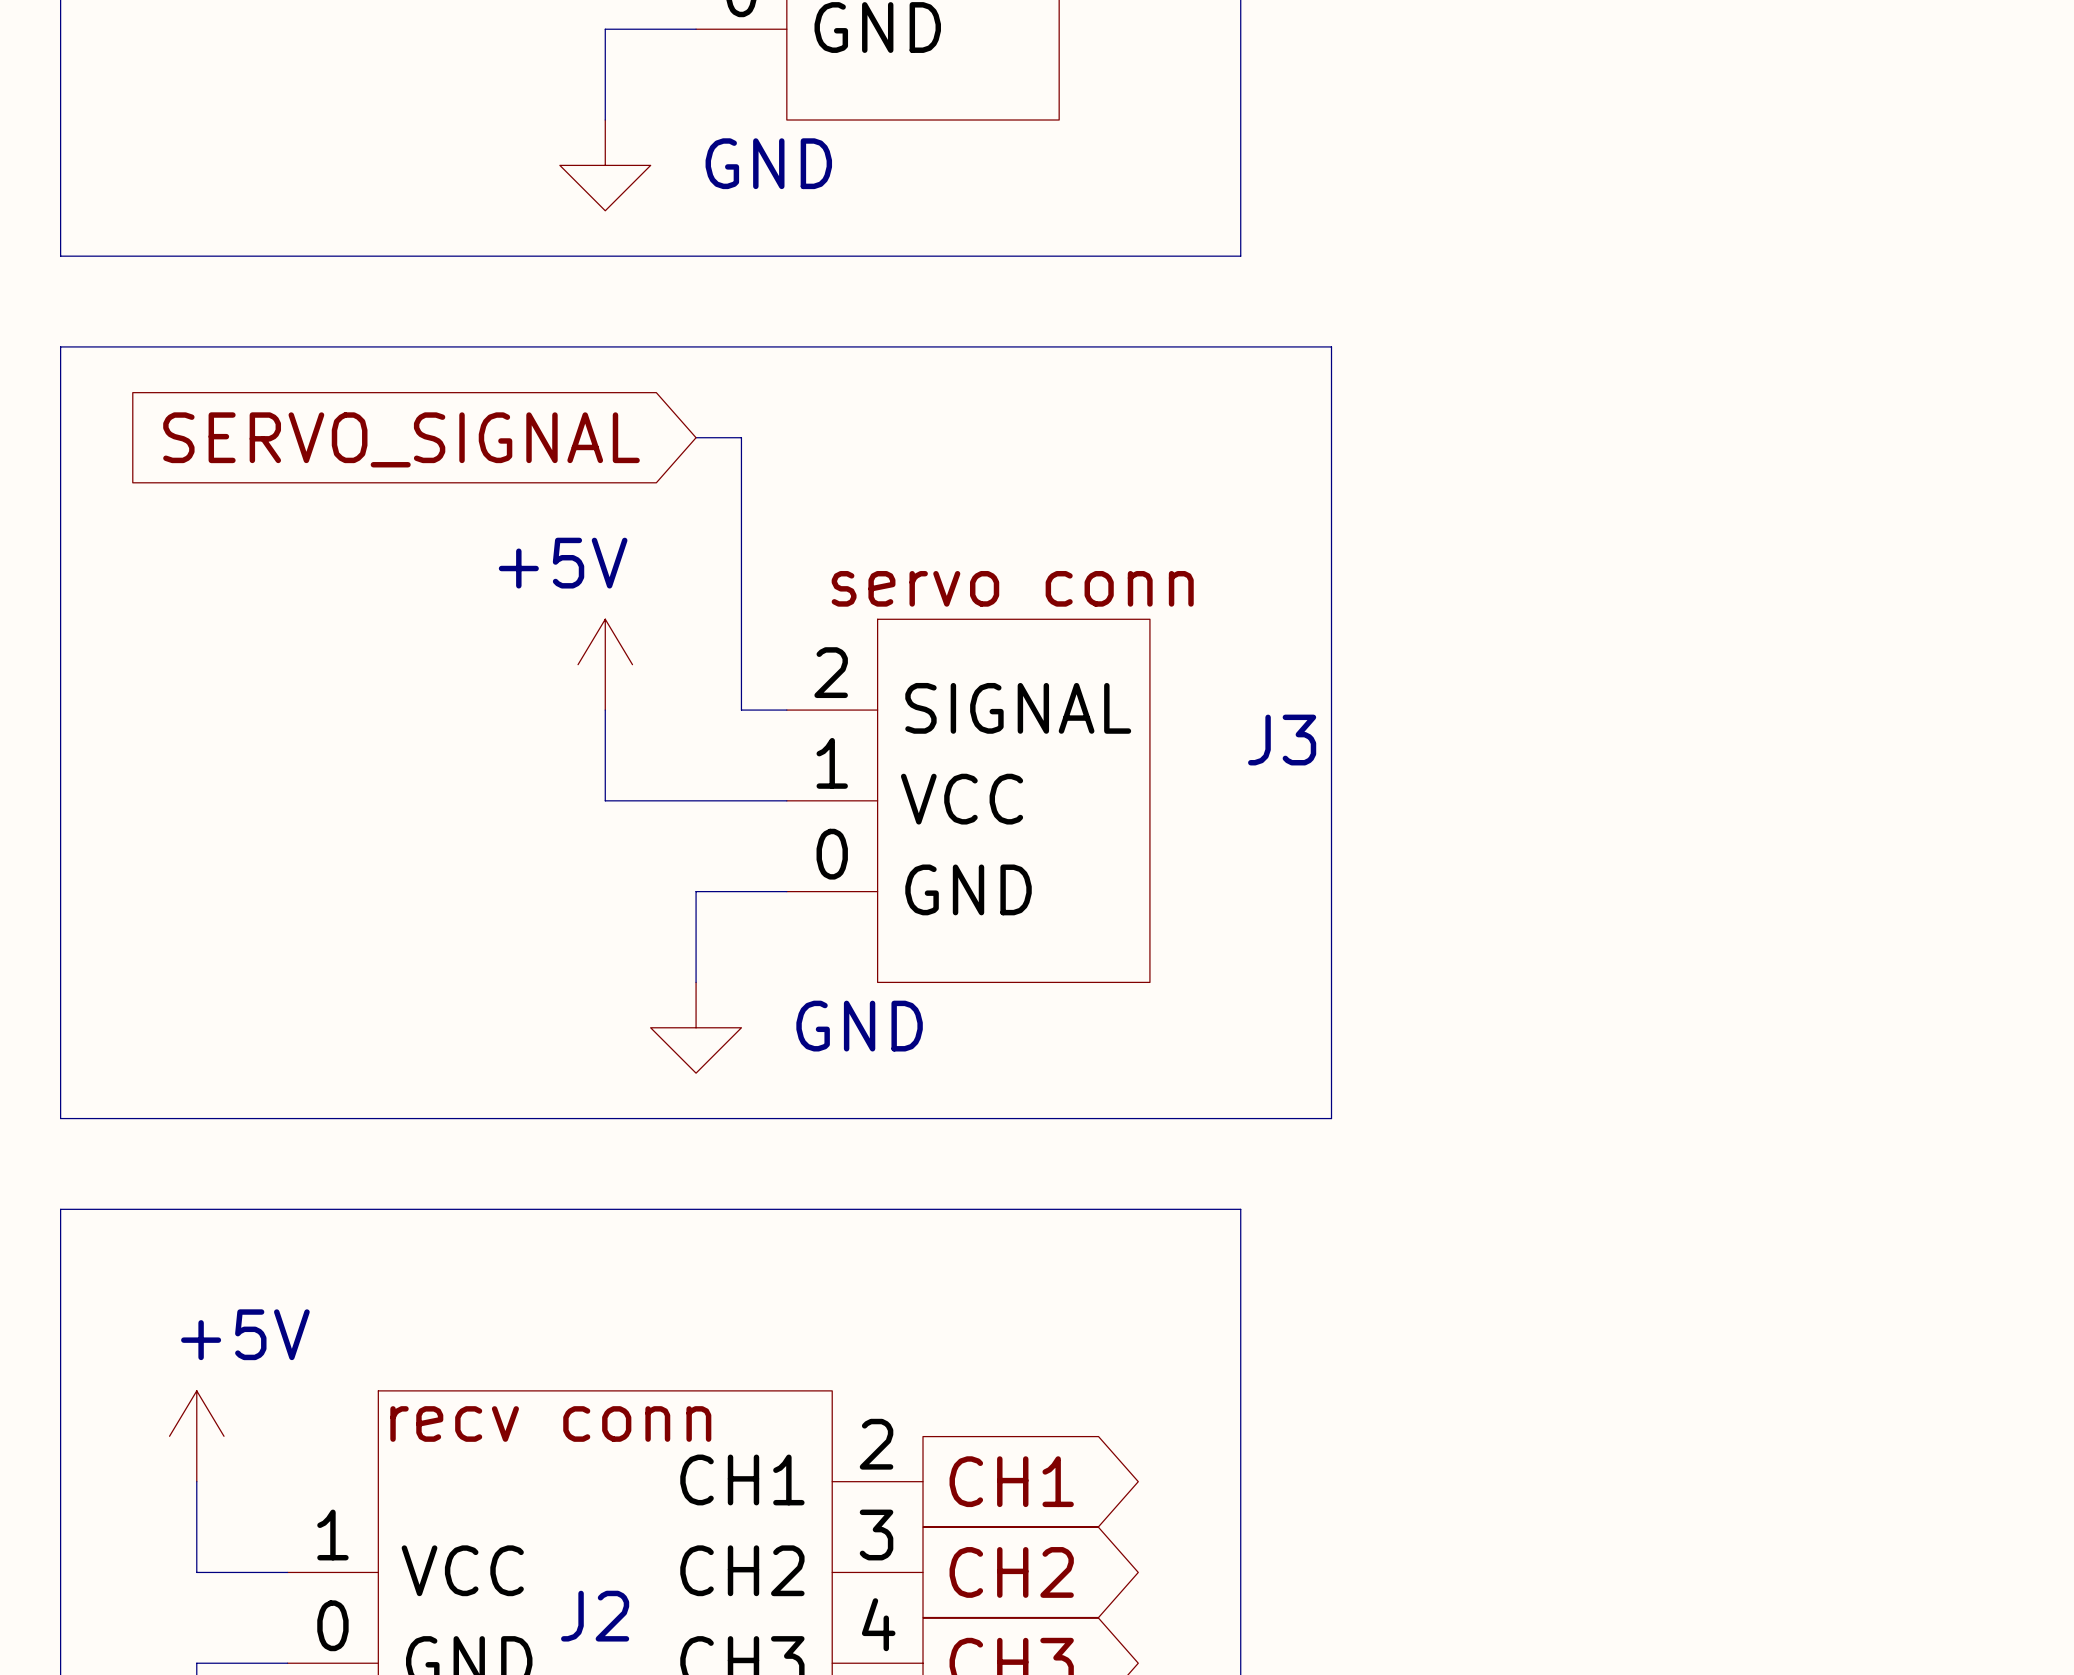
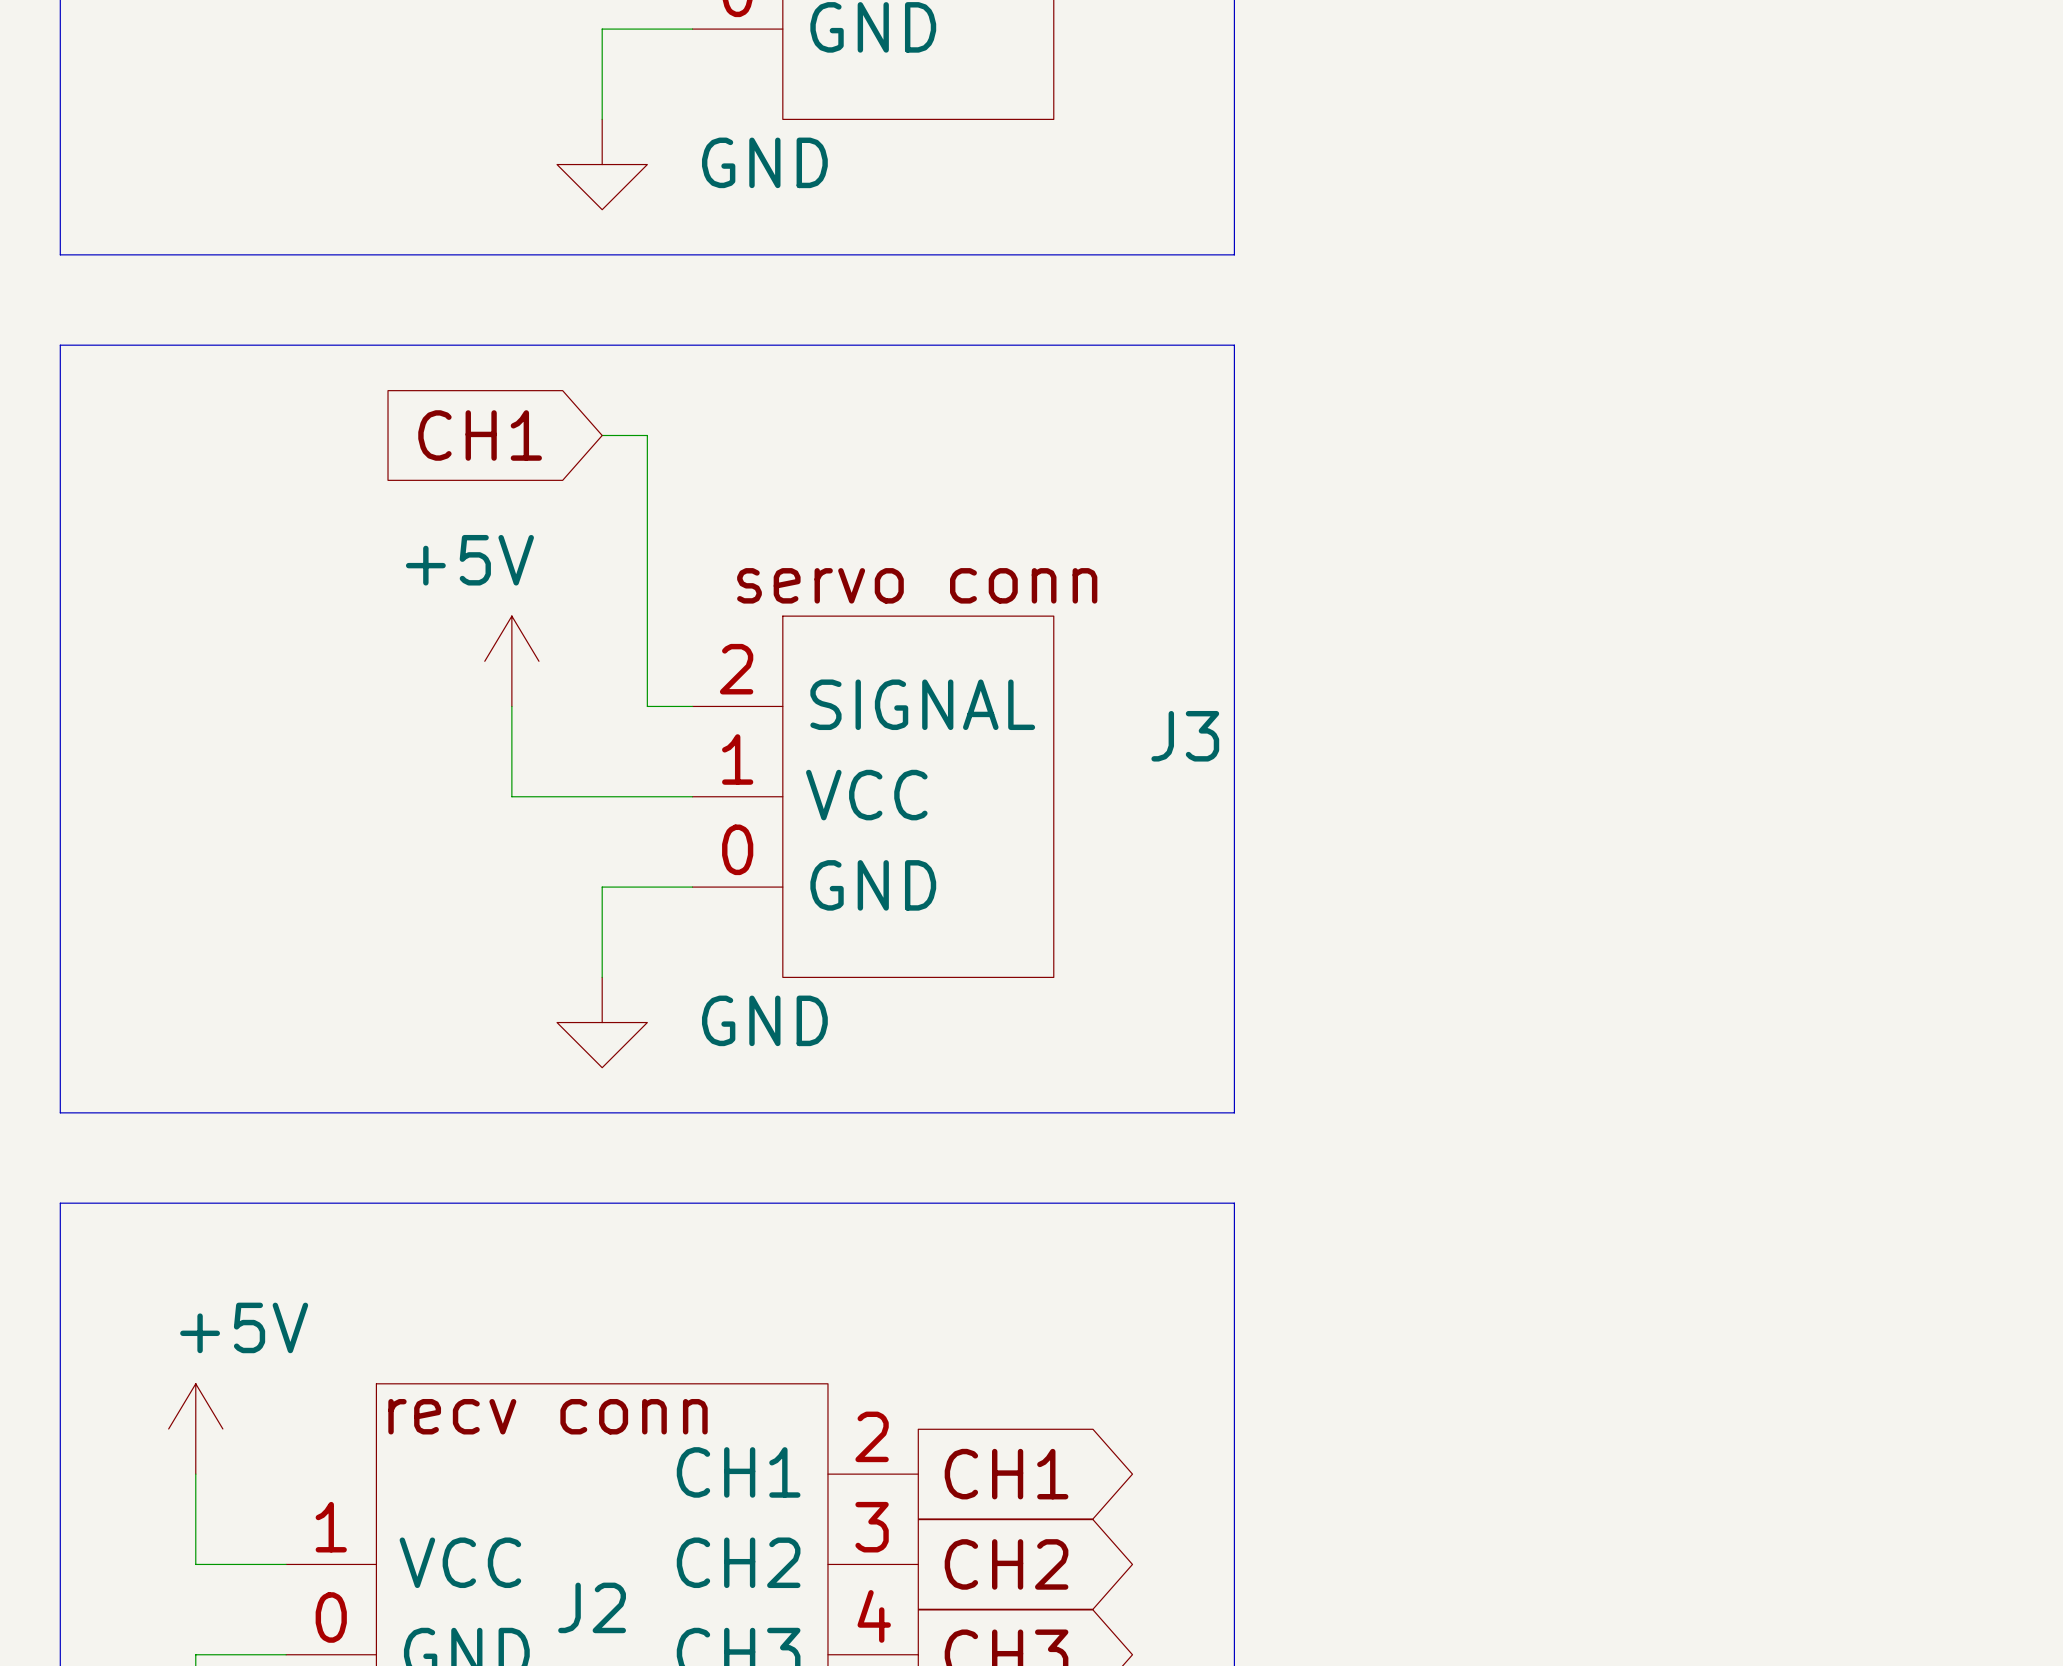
line: (1240, 346) (1331, 346) (1331, 1118) (1240, 1118) -> (1234, 345) (1234, 1112)
global label: none -> CH1 (480, 435)
wire: (696, 437) (741, 437) (741, 710) (786, 710) -> (602, 435) (647, 435) (647, 706) (692, 706)
global label: SERVO_SIGNAL (401, 439) -> none
power symbol position: +5V (605, 664) -> +5V (511, 661)
wire: (605, 710) (605, 800) -> (511, 706) (511, 796) (602, 796)
J3 position: (968, 800) -> (873, 796)
wire: (786, 891) (696, 891) (696, 982) -> (692, 887) (602, 887) (602, 977)
power symbol position: GND (696, 1027) -> GND (602, 1022)

